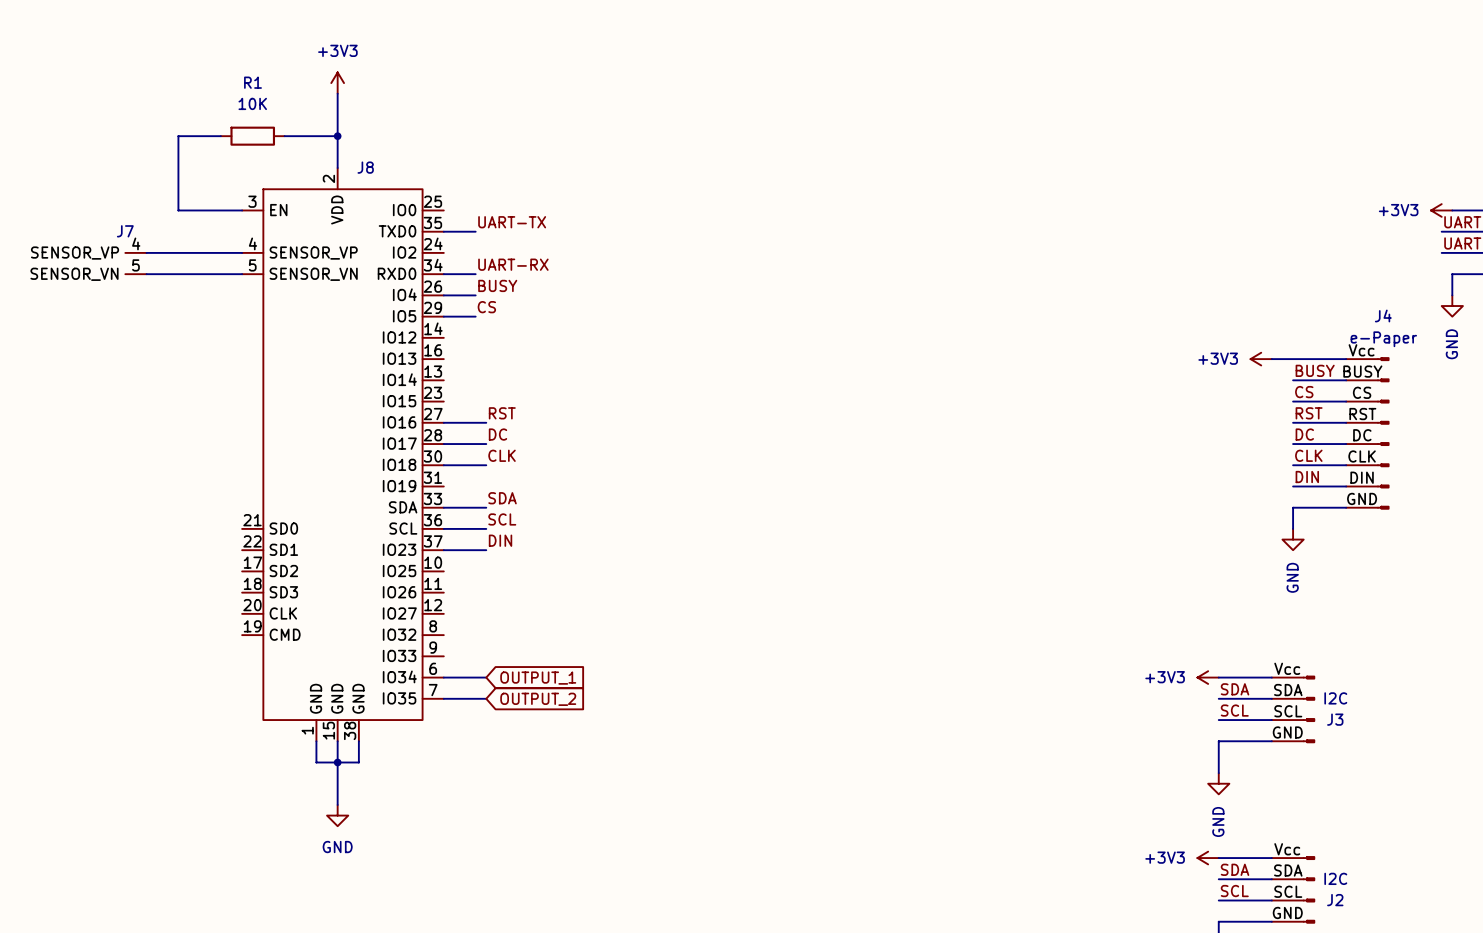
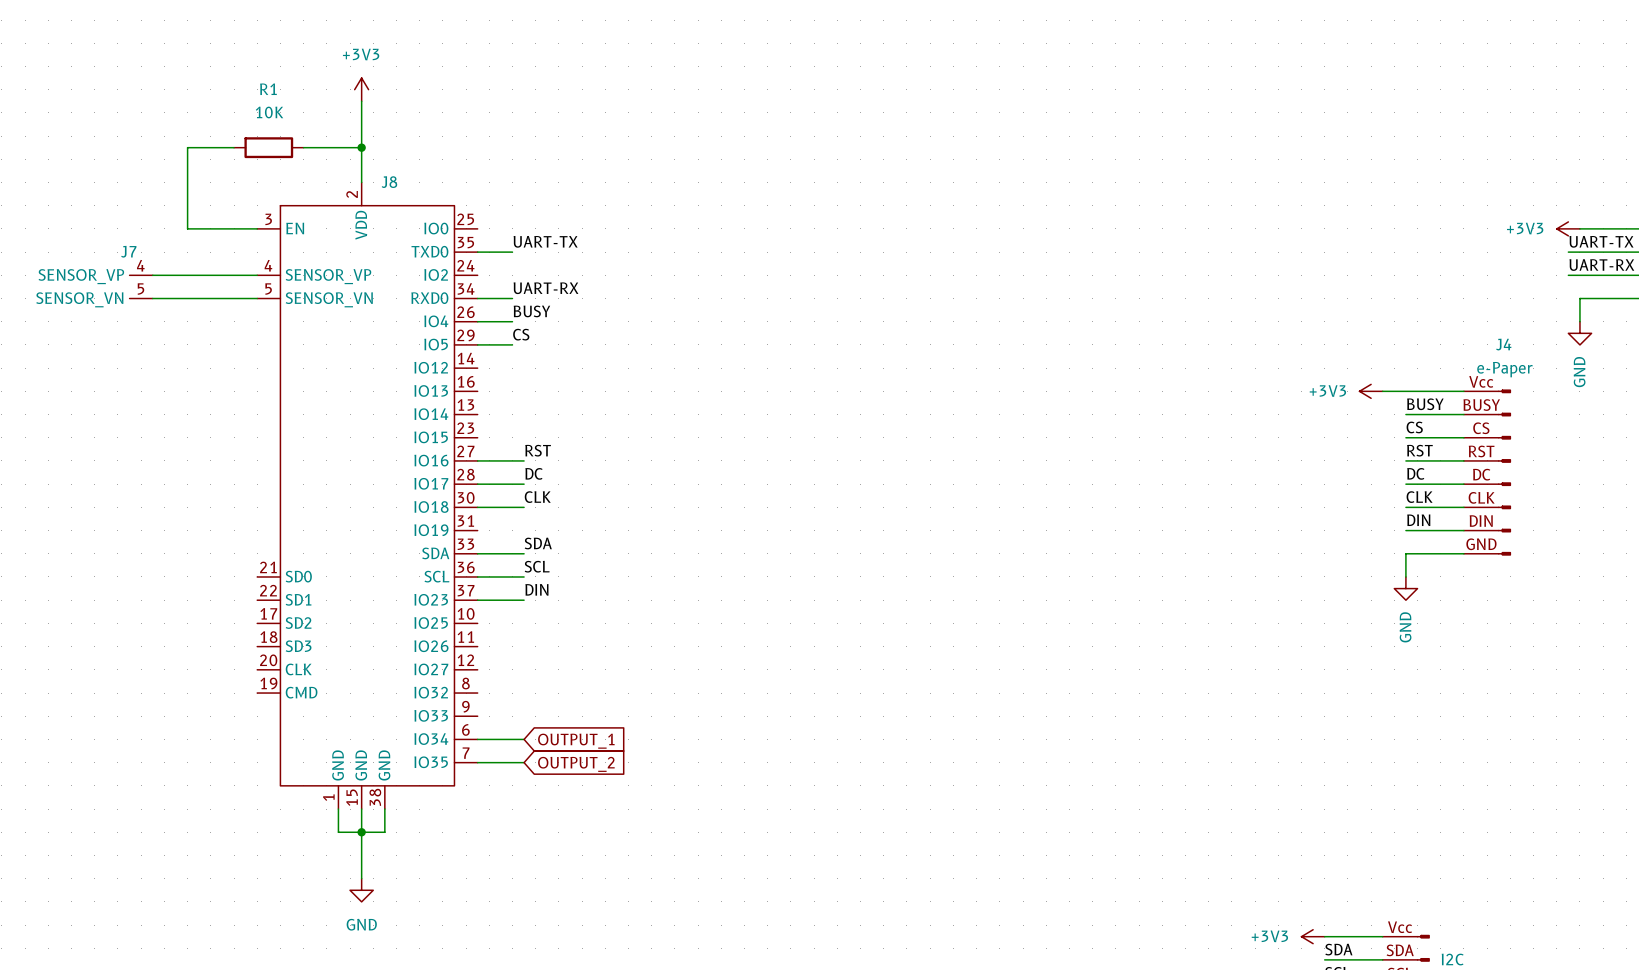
power symbol: +3V3 (1208, 677) -> none
wire: (1218, 677) (1271, 677) -> none
label: SDA (1235, 689) -> none
wire: (1218, 698) (1271, 698) -> none
J3: I2C (1293, 709) -> none
label: SCL (1234, 710) -> none
wire: (1218, 720) (1271, 720) -> none
wire: (1271, 741) (1218, 741) (1218, 773) -> none
power symbol: GND (1218, 783) -> none

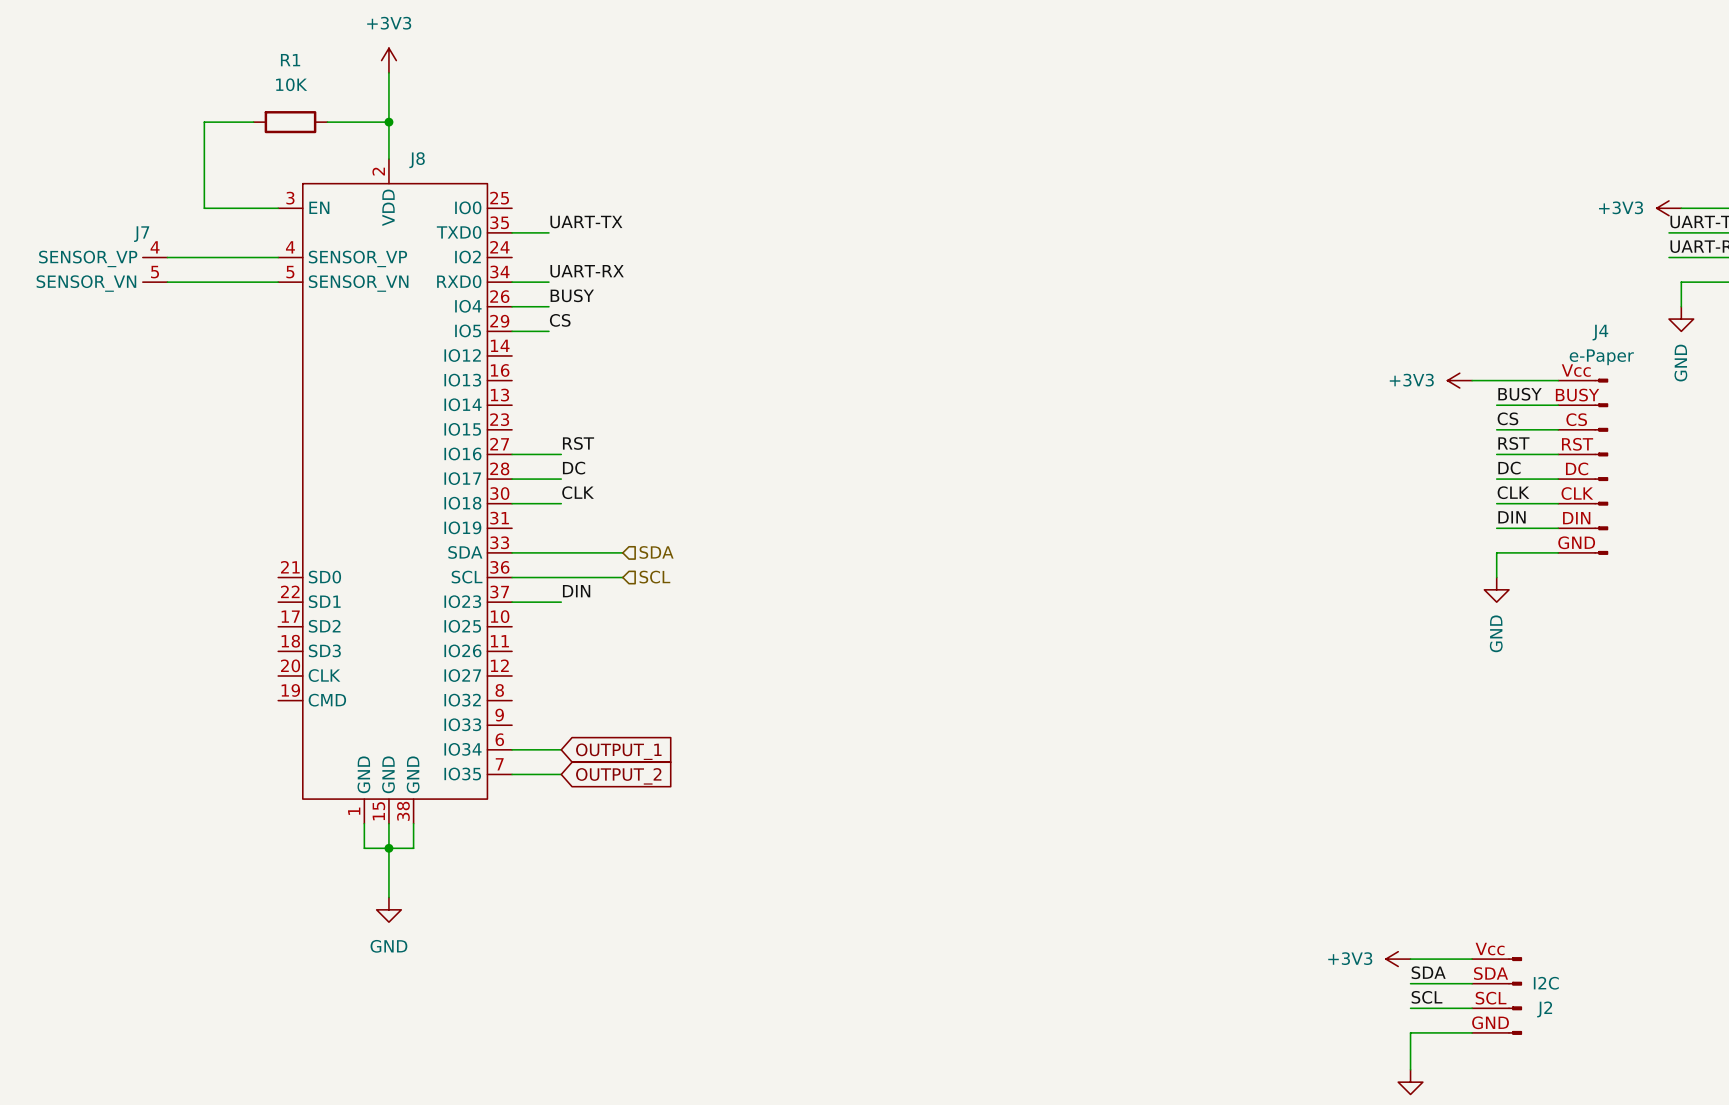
label: SDA (538, 543) -> none
wire: none -> (561, 552) (622, 552)
hierarchical label: none -> SDA (656, 552)
label: SCL (537, 566) -> none
wire: none -> (561, 577) (622, 577)
hierarchical label: none -> SCL (654, 577)

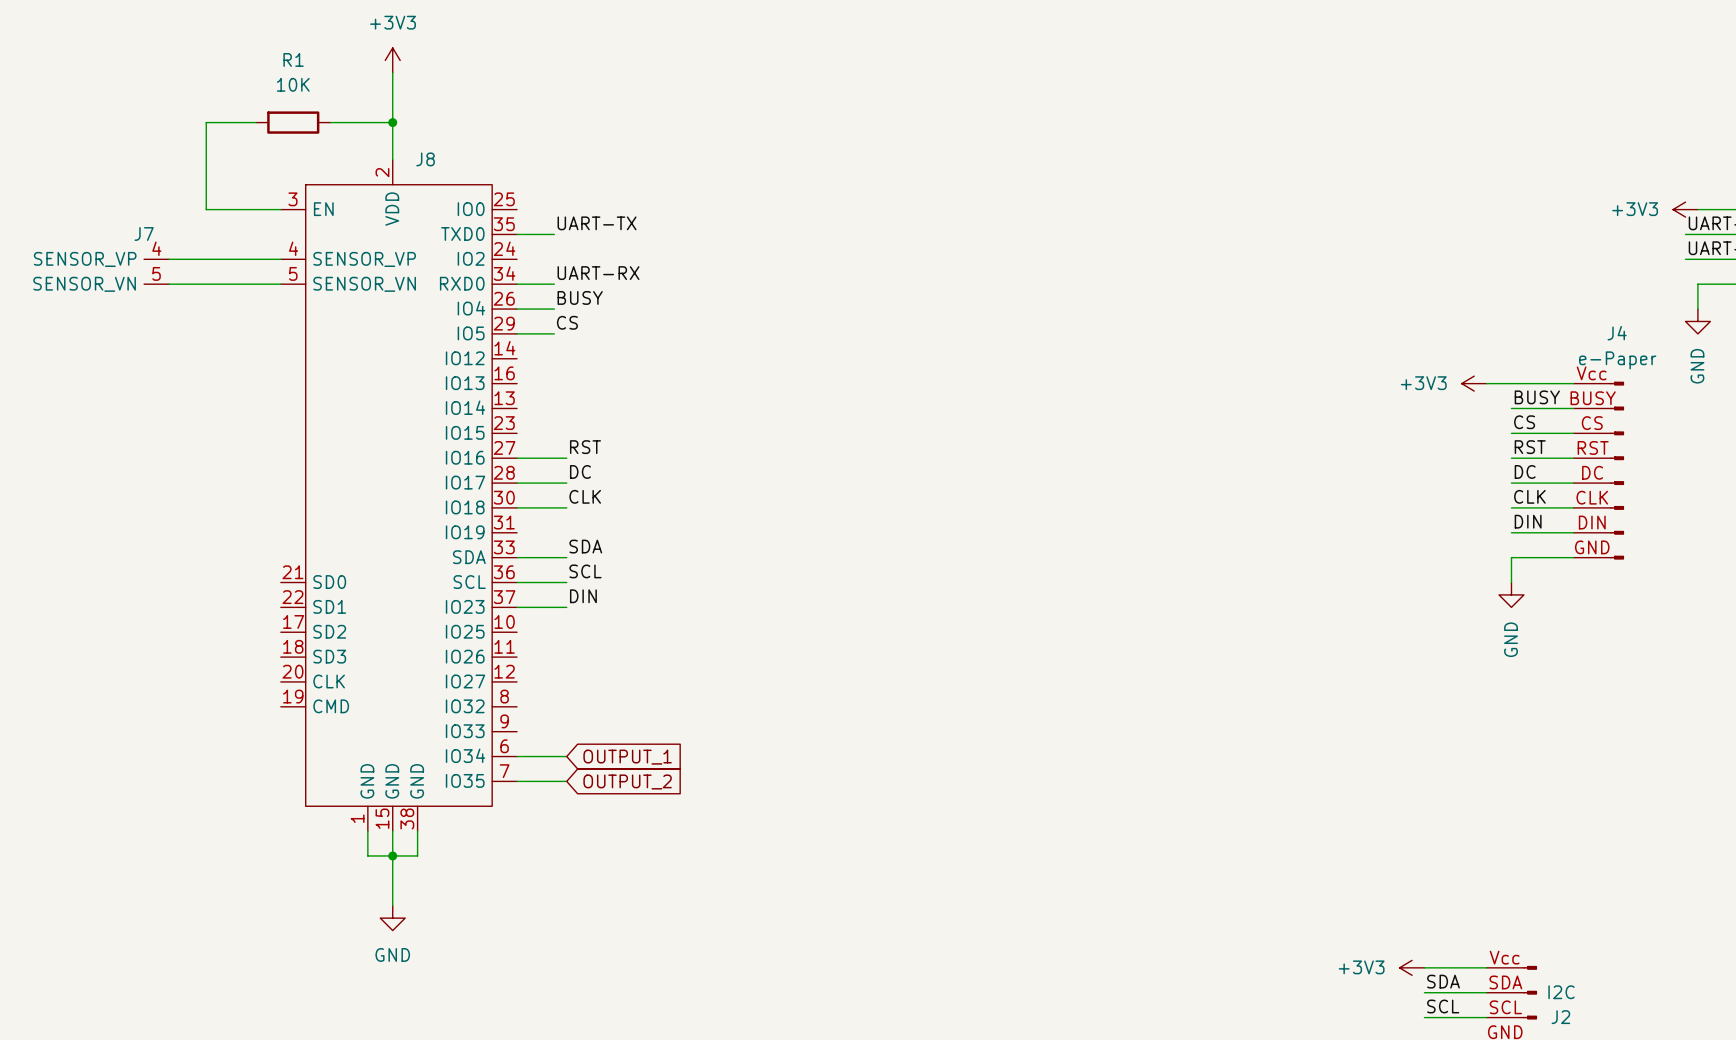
label: none -> SDA (585, 546)
wire: (561, 552) (622, 552) -> none
hierarchical label: SDA (656, 552) -> none
label: none -> SCL (585, 571)
wire: (561, 577) (622, 577) -> none
hierarchical label: SCL (654, 577) -> none

